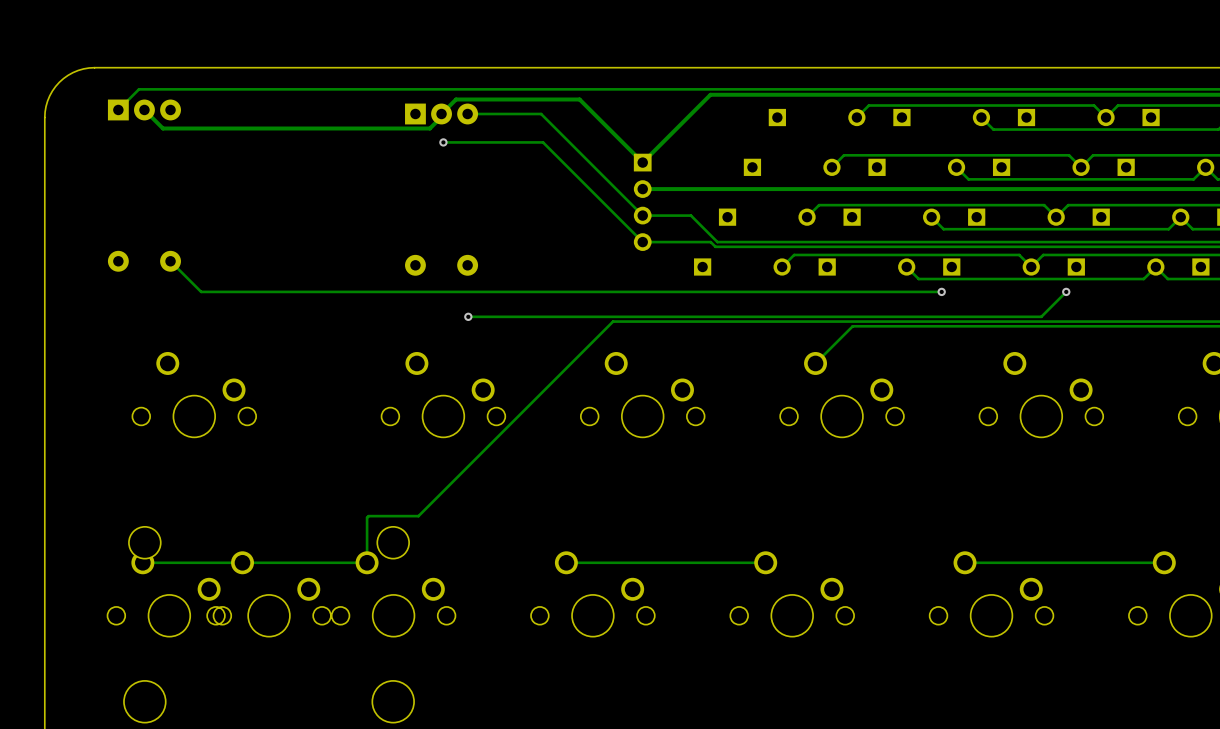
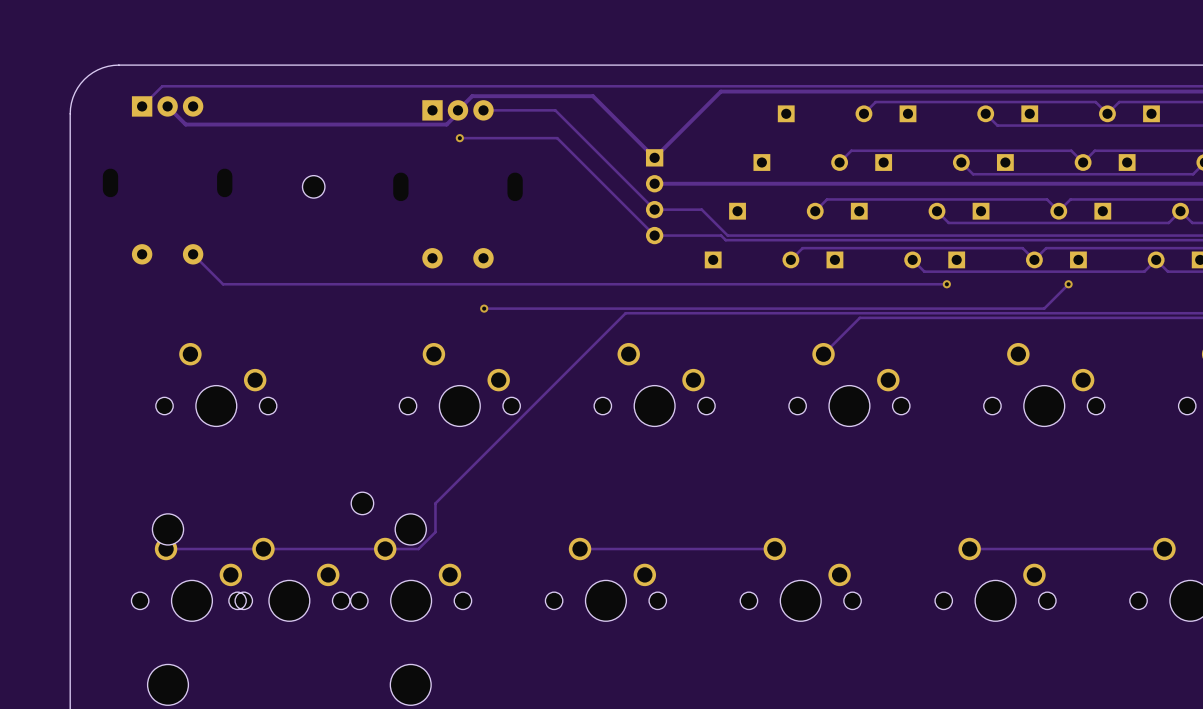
part: none -> (313, 186)
part: none -> (362, 503)
track: (418, 516) (368, 516) (367, 517) (367, 562) -> (435, 503) (435, 532) (418, 549) (385, 549)

